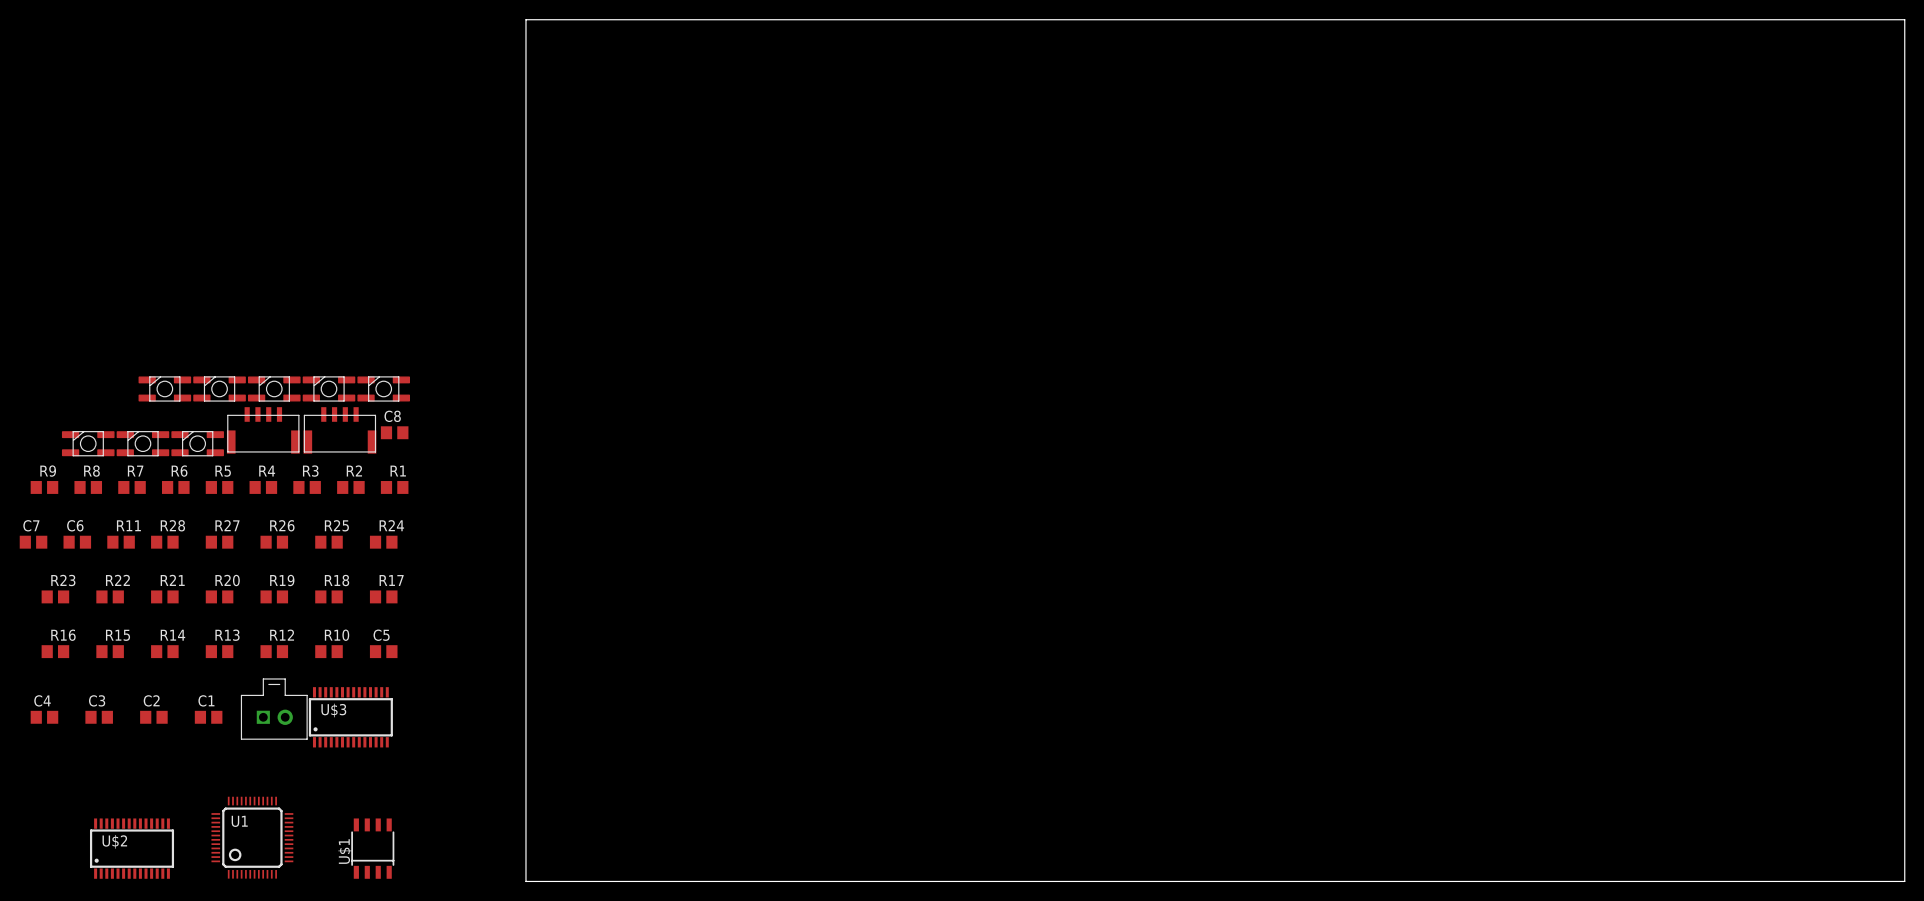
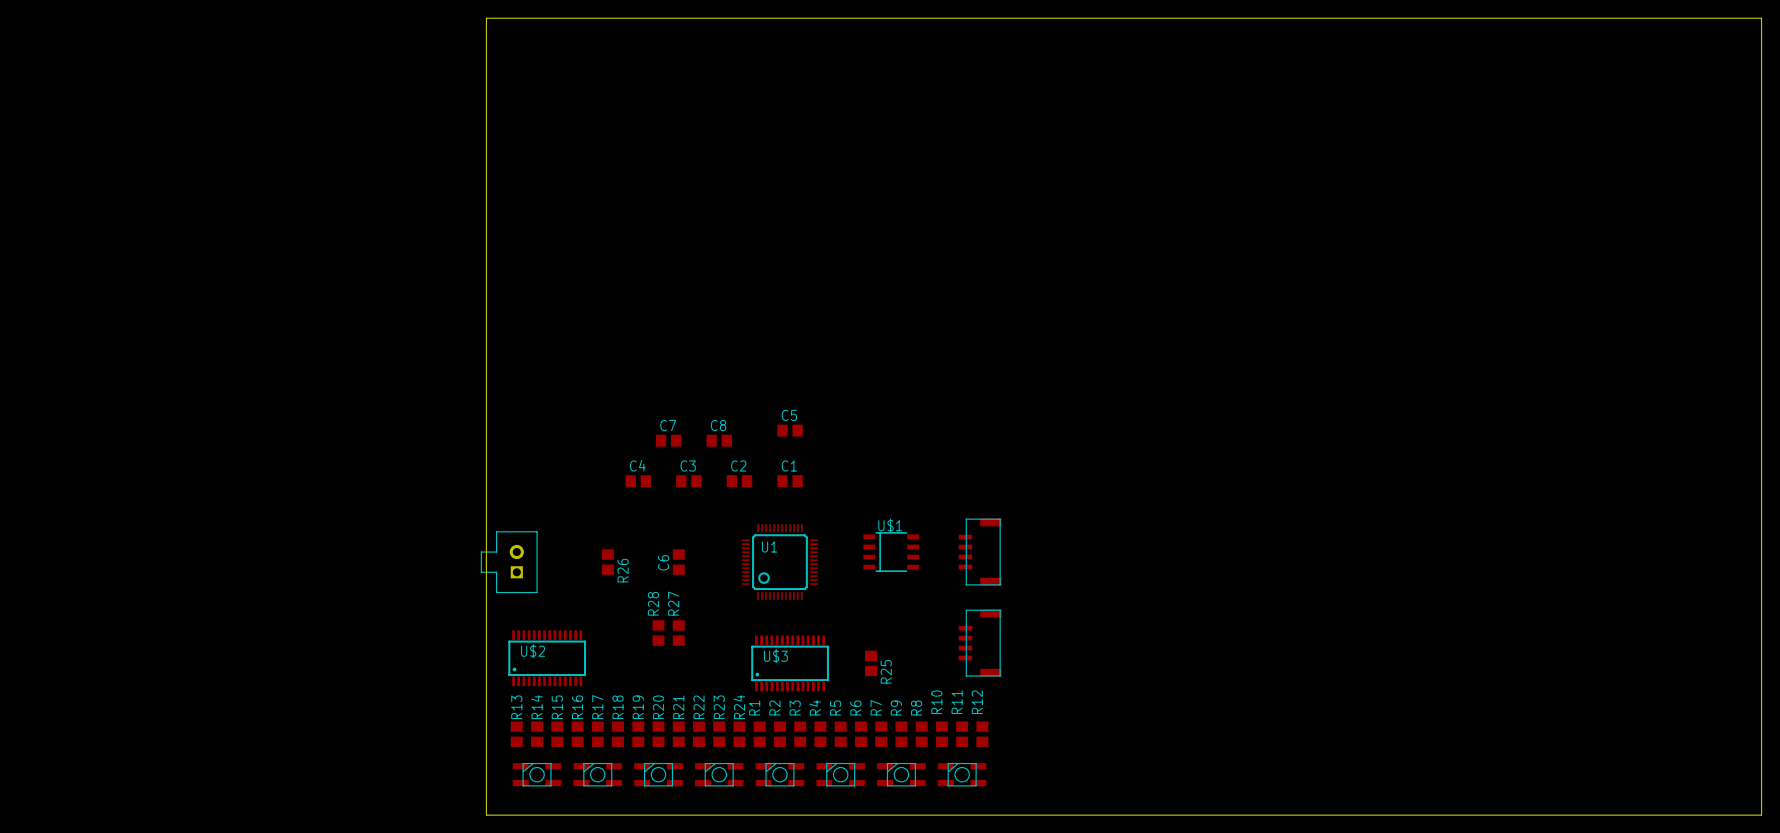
part: (164, 388) -> none
part: (219, 388) -> none
part: (274, 388) -> none
part: (329, 388) -> none
part: (383, 388) -> none
part: (263, 430) -> none
part: (339, 430) -> none
C8 position: (394, 432) -> (719, 440)
part: (88, 443) -> none
part: (142, 443) -> none
part: (197, 443) -> none
R9 rotation: 0° (44, 487) -> 90° clockwise (901, 734)
R9 position: (44, 487) -> (901, 734)
R8 rotation: 0° (88, 487) -> 90° clockwise (921, 734)
R8 position: (88, 487) -> (921, 734)
R7 rotation: 0° (132, 487) -> 90° clockwise (881, 734)
R7 position: (132, 487) -> (881, 734)
R6 rotation: 0° (175, 487) -> 90° clockwise (860, 734)
R6 position: (175, 487) -> (860, 734)
R5 rotation: 0° (219, 487) -> 90° clockwise (840, 734)
R5 position: (219, 487) -> (840, 734)
R4 rotation: 0° (263, 487) -> 90° clockwise (820, 734)
R4 position: (263, 487) -> (820, 734)
R3 rotation: 0° (307, 487) -> 90° clockwise (800, 734)
R3 position: (307, 487) -> (800, 734)
R2 rotation: 0° (350, 487) -> 90° clockwise (779, 734)
R2 position: (350, 487) -> (779, 734)
R1 rotation: 0° (394, 487) -> 90° clockwise (759, 734)
R1 position: (394, 487) -> (759, 734)
C6 name position: C6 (75, 525) -> C6 (663, 562)
R11 name position: R11 (128, 525) -> R11 (957, 702)
R28 name position: R28 (172, 525) -> R28 (653, 603)
R27 name position: R27 (227, 525) -> R27 (673, 603)
C7 position: (33, 542) -> (668, 440)
C6 rotation: 0° (77, 542) -> 90° clockwise (678, 562)
C6 position: (77, 542) -> (678, 562)
R11 rotation: 0° (121, 542) -> 90° clockwise (962, 734)
R11 position: (121, 542) -> (962, 734)
R28 rotation: 0° (164, 542) -> 90° clockwise (658, 633)
R28 position: (164, 542) -> (658, 633)
R27 rotation: 0° (219, 542) -> 90° clockwise (678, 633)
R27 position: (219, 542) -> (678, 633)
R26 rotation: 0° (274, 542) -> 90° clockwise (607, 562)
R26 position: (274, 542) -> (607, 562)
R25 rotation: 0° (329, 542) -> 90° clockwise (871, 663)
R25 position: (329, 542) -> (871, 663)
R24 rotation: 0° (383, 542) -> 90° clockwise (739, 734)
R24 position: (383, 542) -> (739, 734)
R23 rotation: 0° (55, 596) -> 90° clockwise (719, 734)
R23 position: (55, 596) -> (719, 734)
R22 rotation: 0° (110, 596) -> 90° clockwise (698, 734)
R22 position: (110, 596) -> (698, 734)
R21 rotation: 0° (164, 596) -> 90° clockwise (678, 734)
R21 position: (164, 596) -> (678, 734)
R20 rotation: 0° (219, 596) -> 90° clockwise (658, 734)
R20 position: (219, 596) -> (658, 734)
R19 rotation: 0° (274, 596) -> 90° clockwise (638, 734)
R19 position: (274, 596) -> (638, 734)
R18 rotation: 0° (329, 596) -> 90° clockwise (618, 734)
R18 position: (329, 596) -> (618, 734)
R17 rotation: 0° (383, 596) -> 90° clockwise (597, 734)
R17 position: (383, 596) -> (597, 734)
part: none -> (980, 552)
part: none -> (509, 562)
R12 name position: R12 (282, 635) -> R12 (977, 702)
R10 name position: R10 (337, 635) -> R10 (936, 702)
R16 rotation: 0° (55, 651) -> 90° clockwise (577, 734)
R16 position: (55, 651) -> (577, 734)
R15 rotation: 0° (110, 651) -> 90° clockwise (557, 734)
R15 position: (110, 651) -> (557, 734)
R14 rotation: 0° (164, 651) -> 90° clockwise (537, 734)
R14 position: (164, 651) -> (537, 734)
R13 rotation: 0° (219, 651) -> 90° clockwise (516, 734)
R13 position: (219, 651) -> (516, 734)
R12 rotation: 0° (274, 651) -> 90° clockwise (982, 734)
R12 position: (274, 651) -> (982, 734)
R10 rotation: 0° (329, 651) -> 90° clockwise (941, 734)
R10 position: (329, 651) -> (941, 734)
C5 position: (383, 651) -> (790, 430)
part: none -> (980, 643)
part: (274, 709) -> none
C4 position: (44, 717) -> (638, 481)
C3 position: (99, 717) -> (688, 481)
C2 position: (153, 717) -> (739, 481)
C1 position: (208, 717) -> (790, 481)
U$3 position: (350, 717) -> (790, 663)
U1 position: (252, 837) -> (779, 562)
part: none -> (537, 774)
part: none -> (597, 774)
part: none -> (658, 774)
part: none -> (719, 774)
part: none -> (779, 774)
part: none -> (840, 774)
part: none -> (901, 774)
part: none -> (962, 774)
U$2 position: (132, 848) -> (547, 658)
U$1 rotation: 0° (372, 848) -> 90° clockwise (891, 552)
U$1 position: (372, 848) -> (891, 552)

